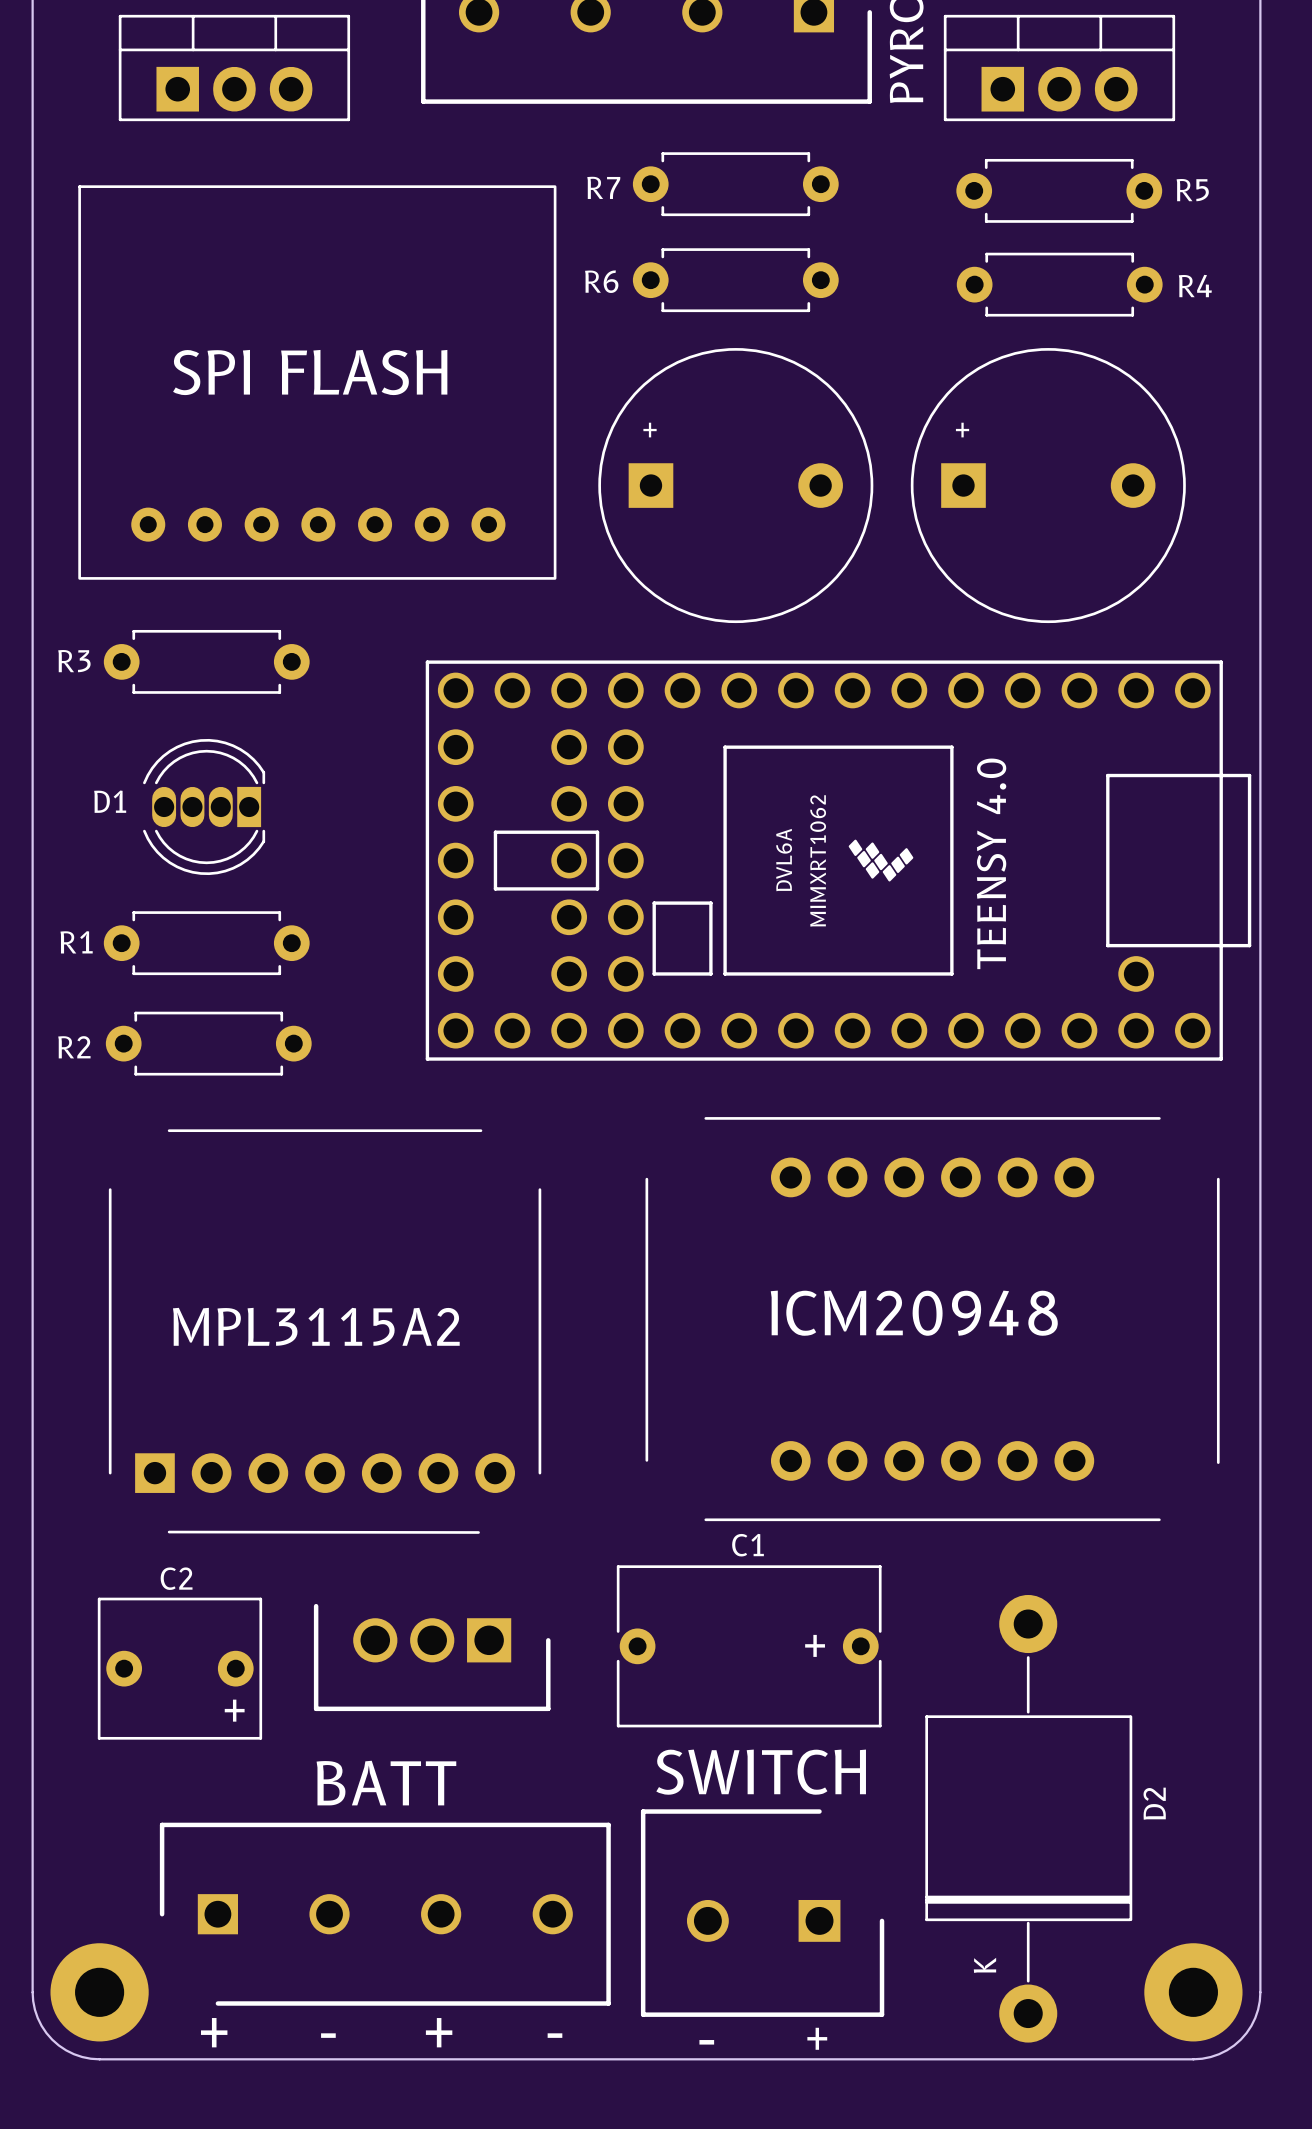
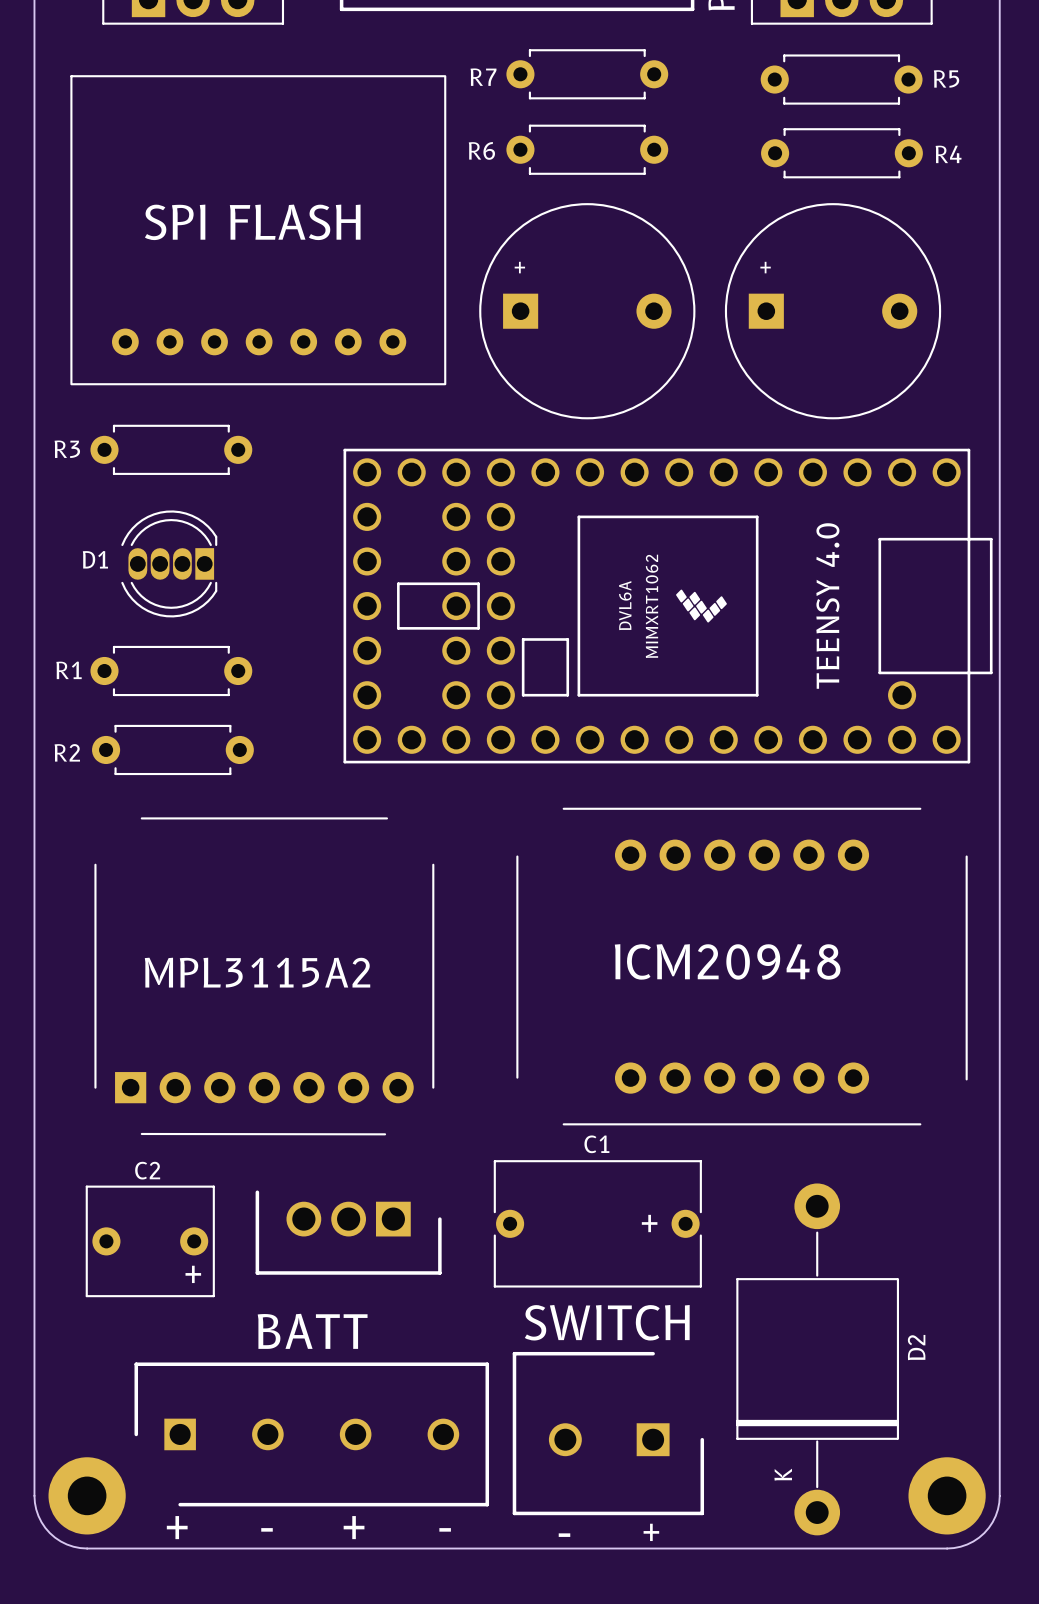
text position: TEENSY 4.0 (991, 863) -> TEENSY 4.0 (827, 606)

